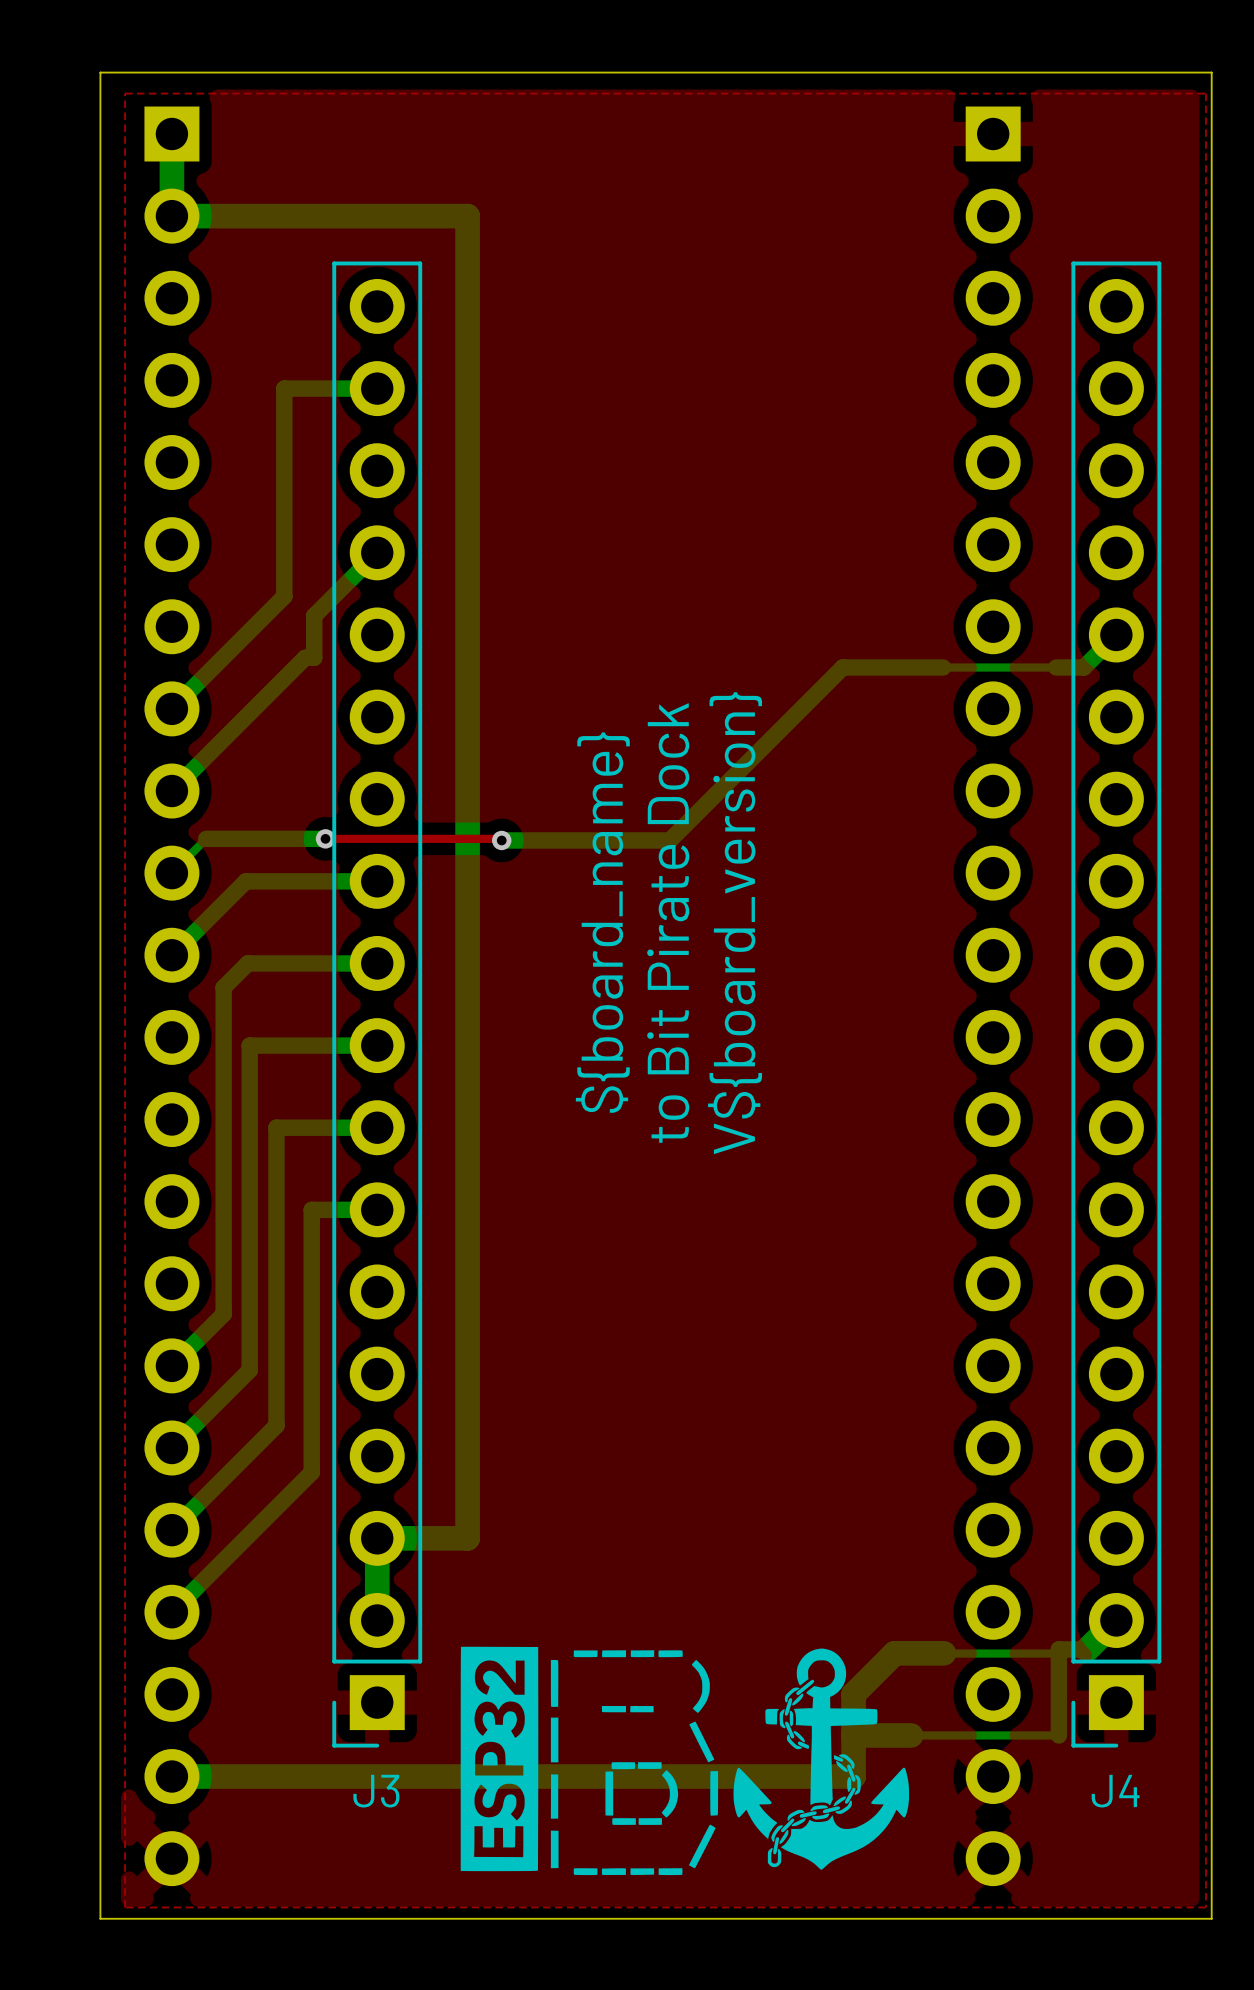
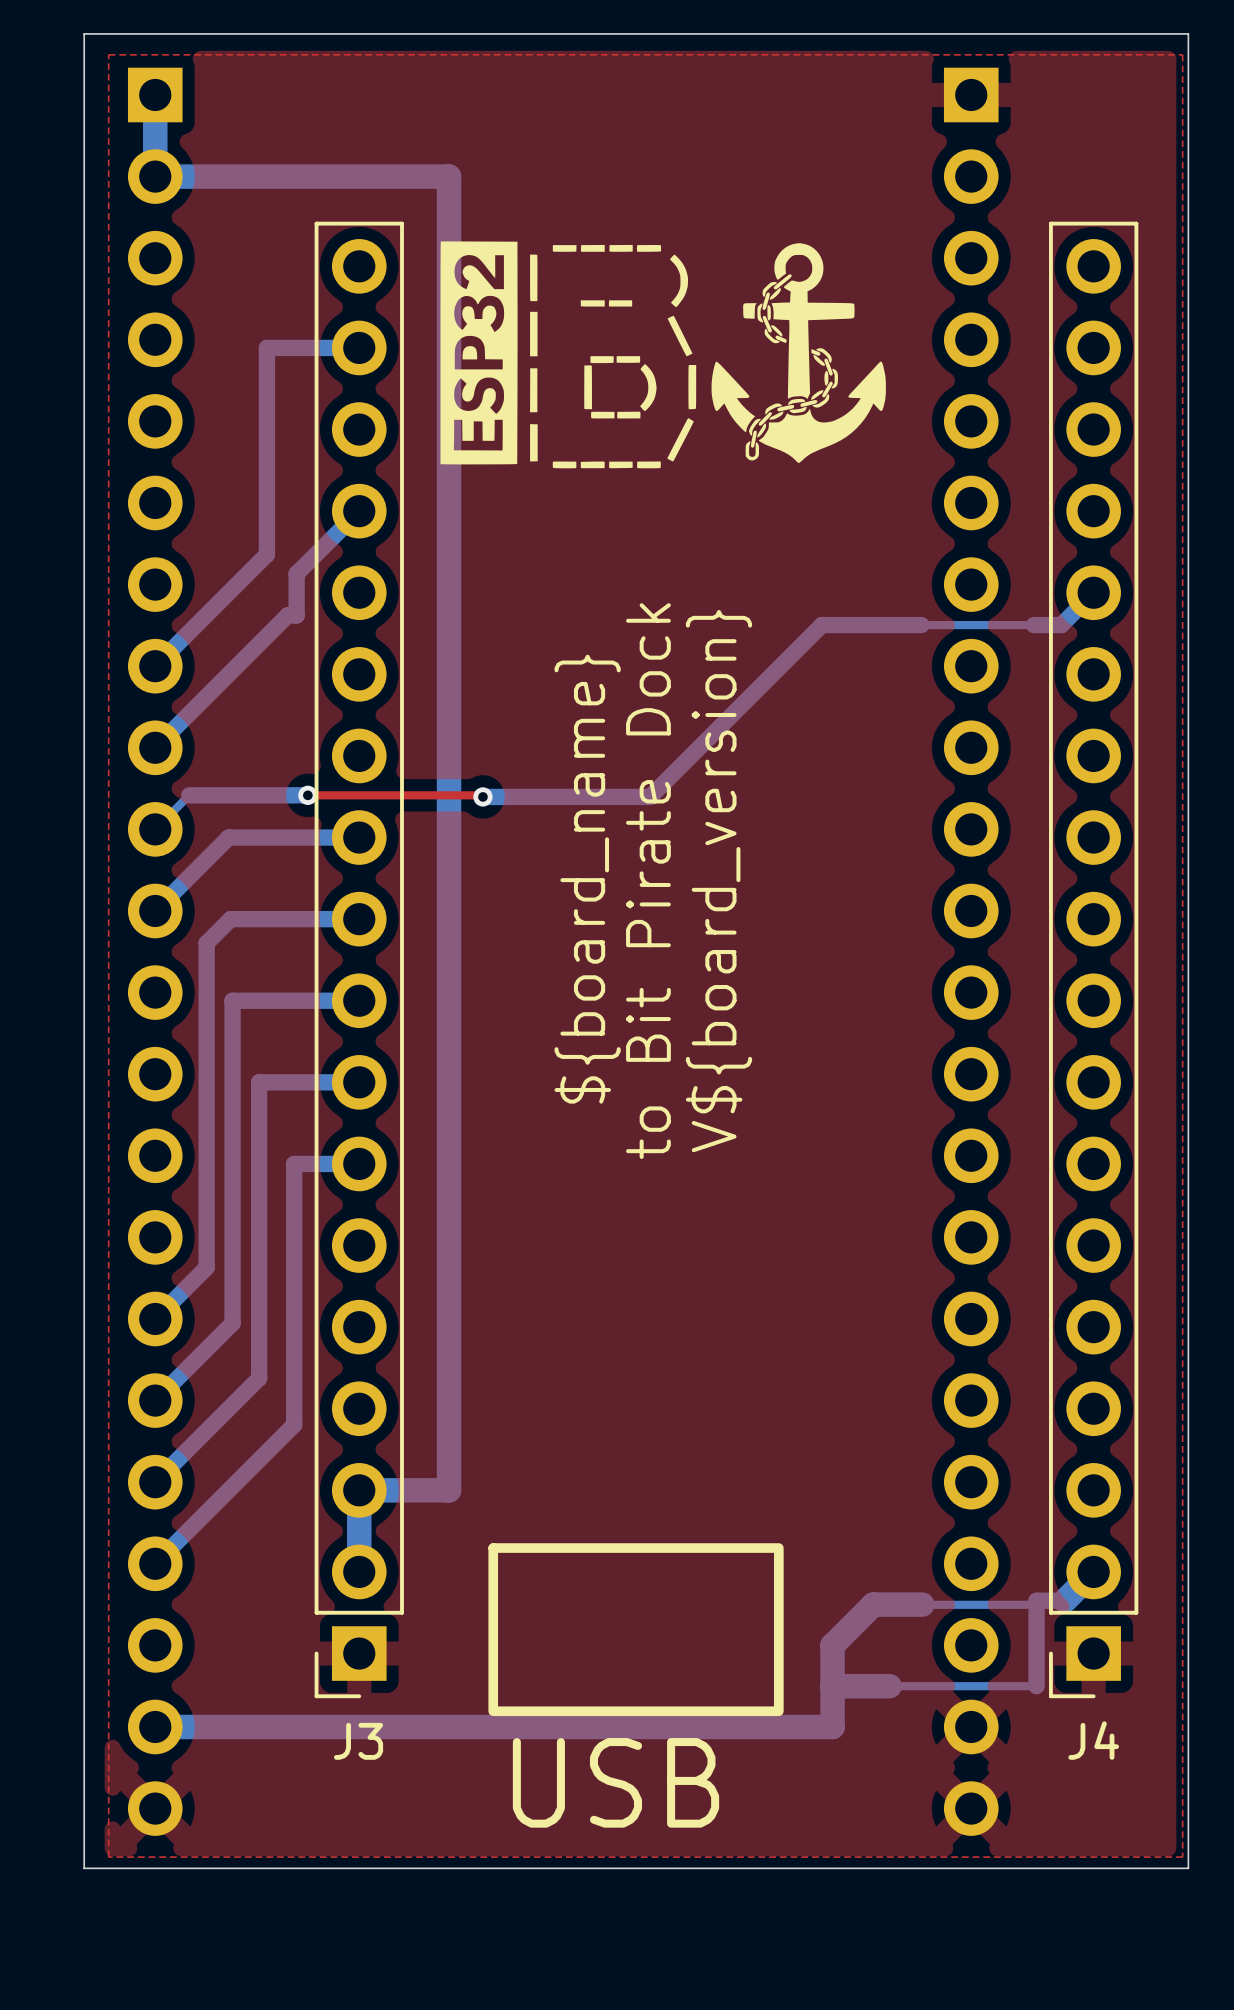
drawing: none -> [440, 241, 886, 469]
drawing: none -> [488, 1543, 784, 1717]
drawing: [460, 1646, 910, 1876] -> none

